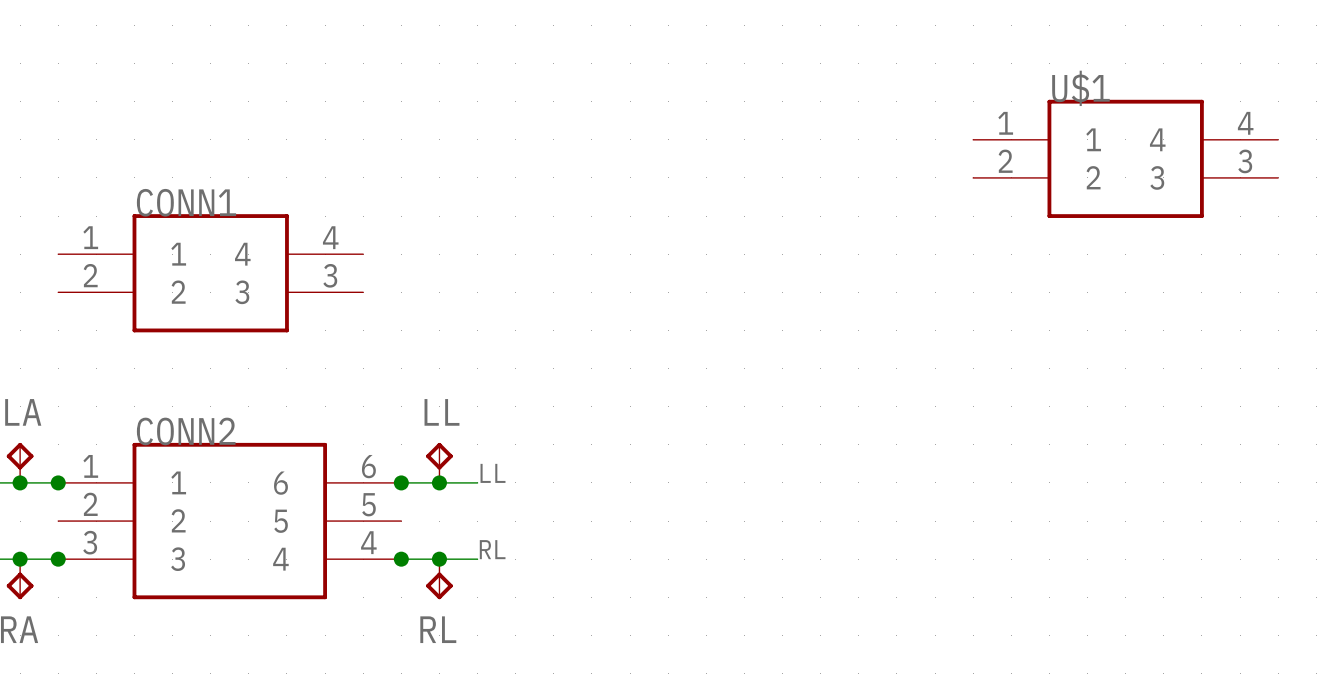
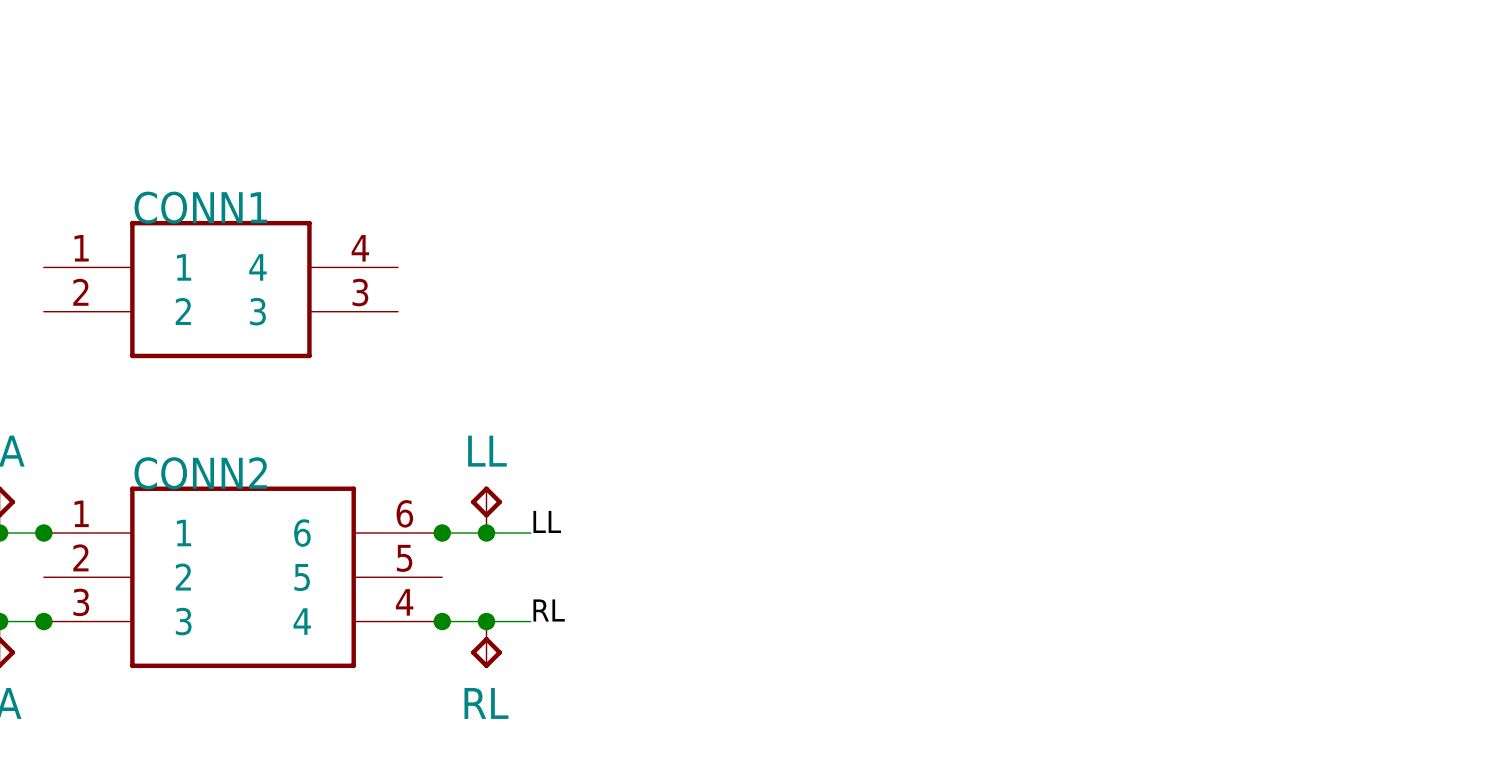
U$1: (1125, 158) -> none

